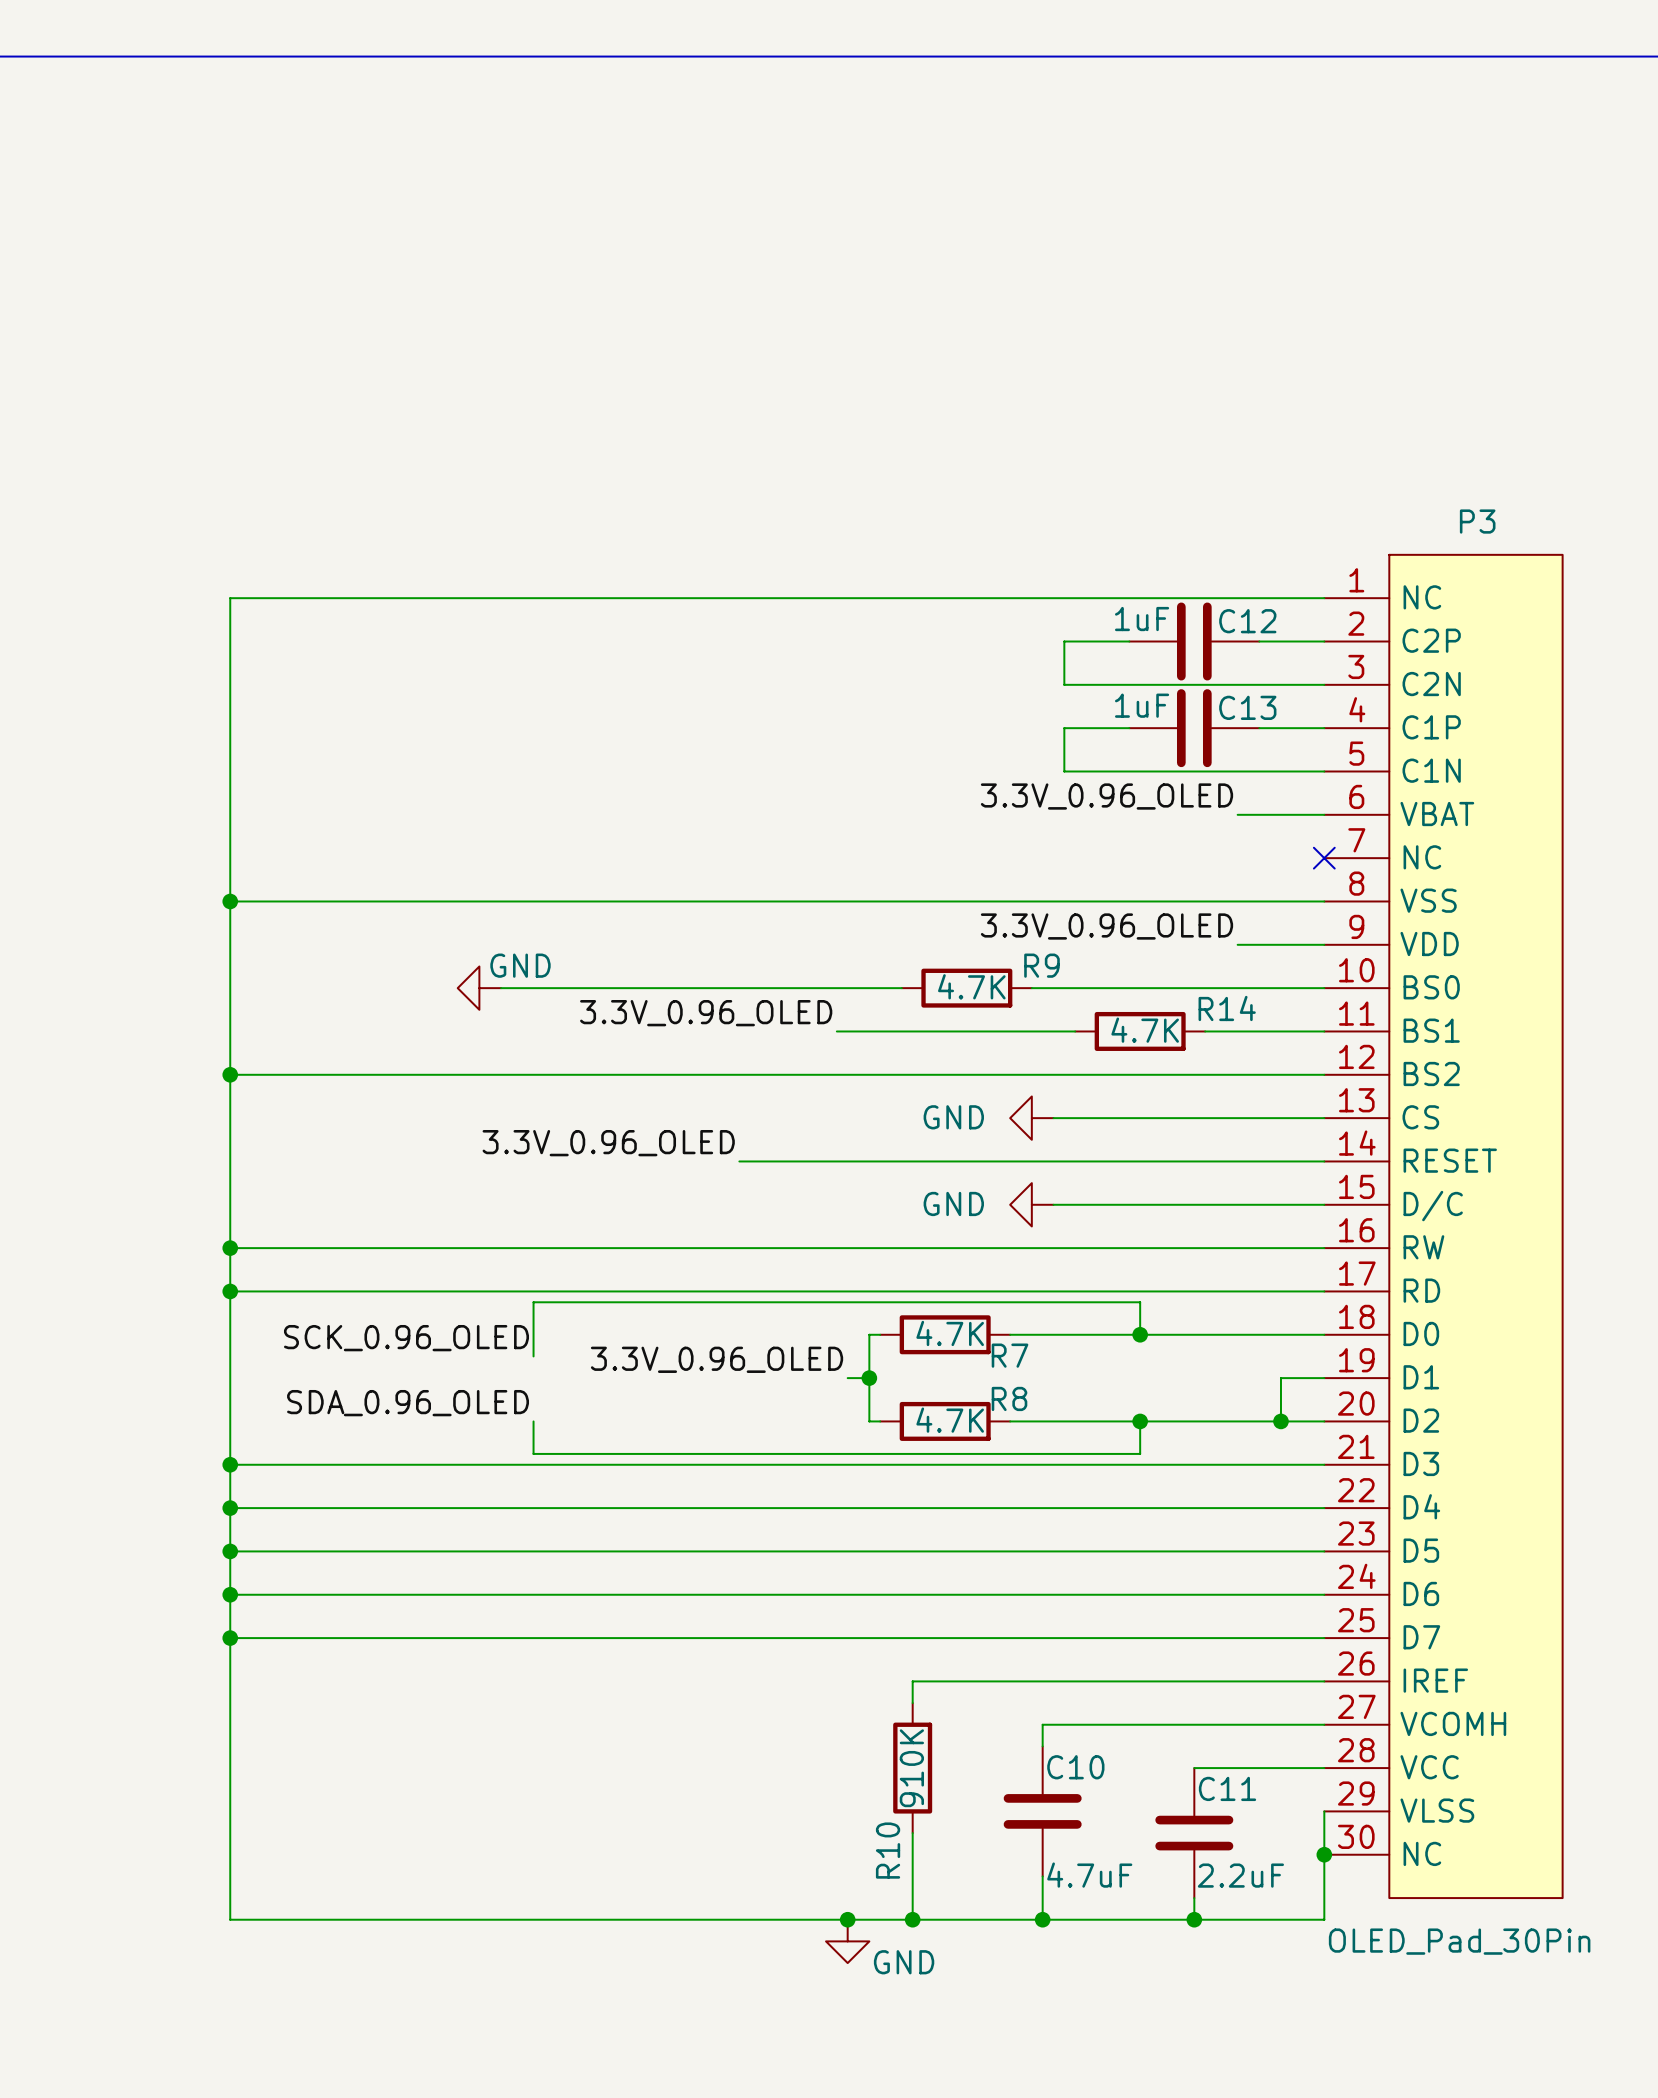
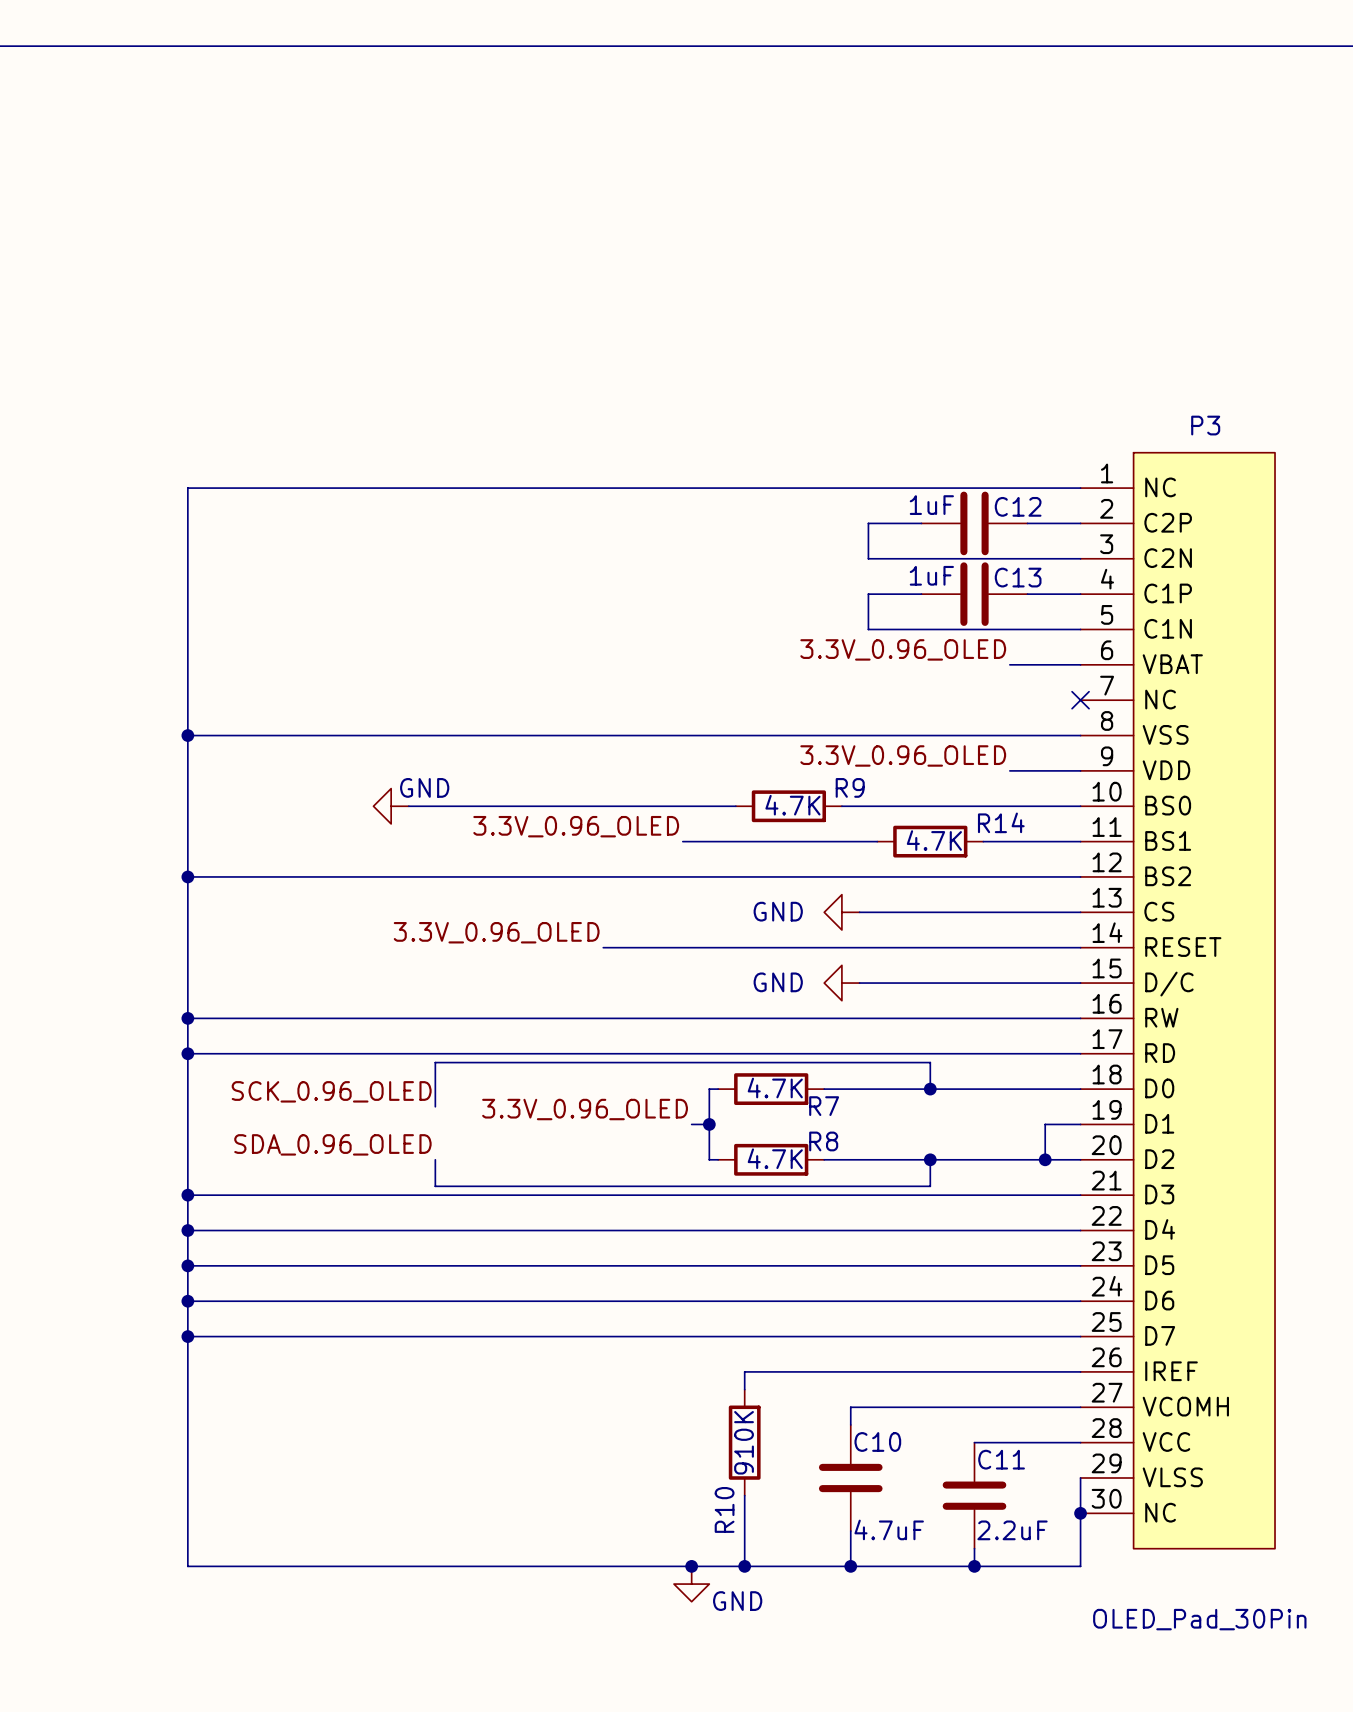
P3 value position: OLED_Pad_30Pin (1459, 1941) -> OLED_Pad_30Pin (1199, 1619)

